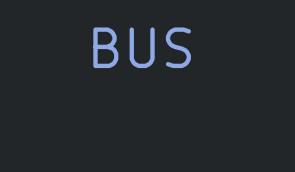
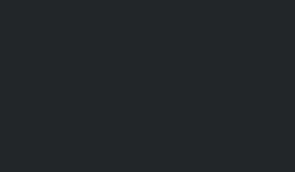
text: BUS (142, 47) -> none

